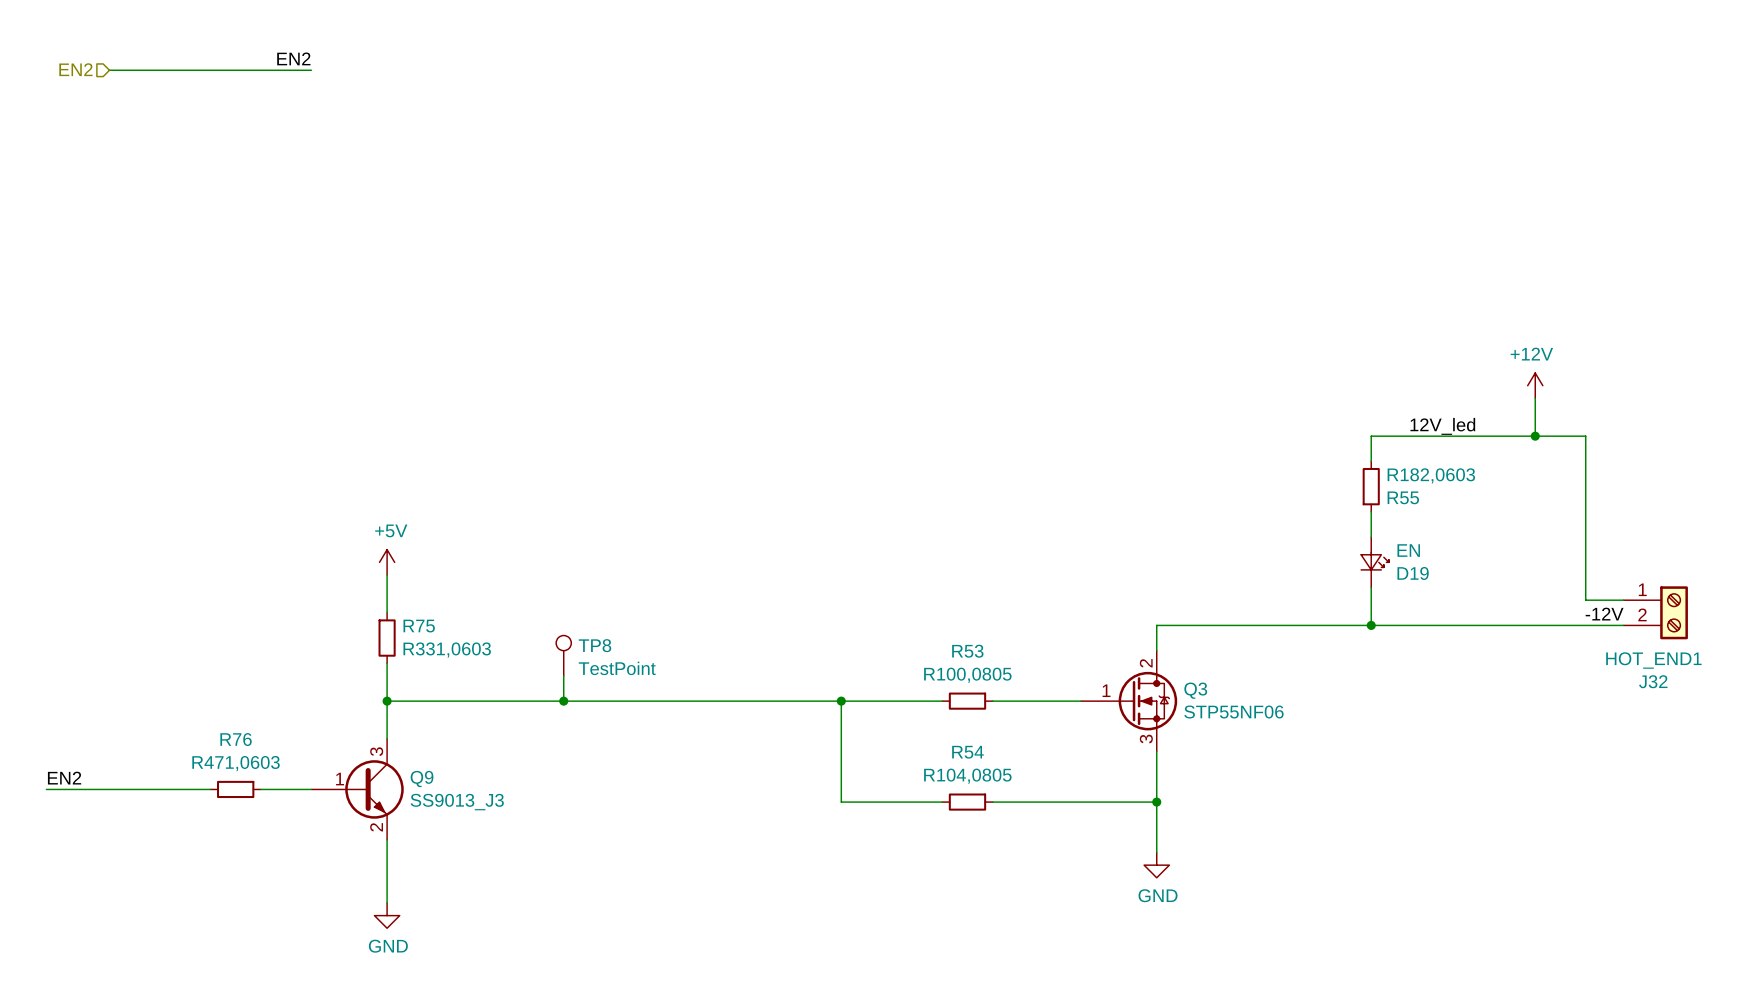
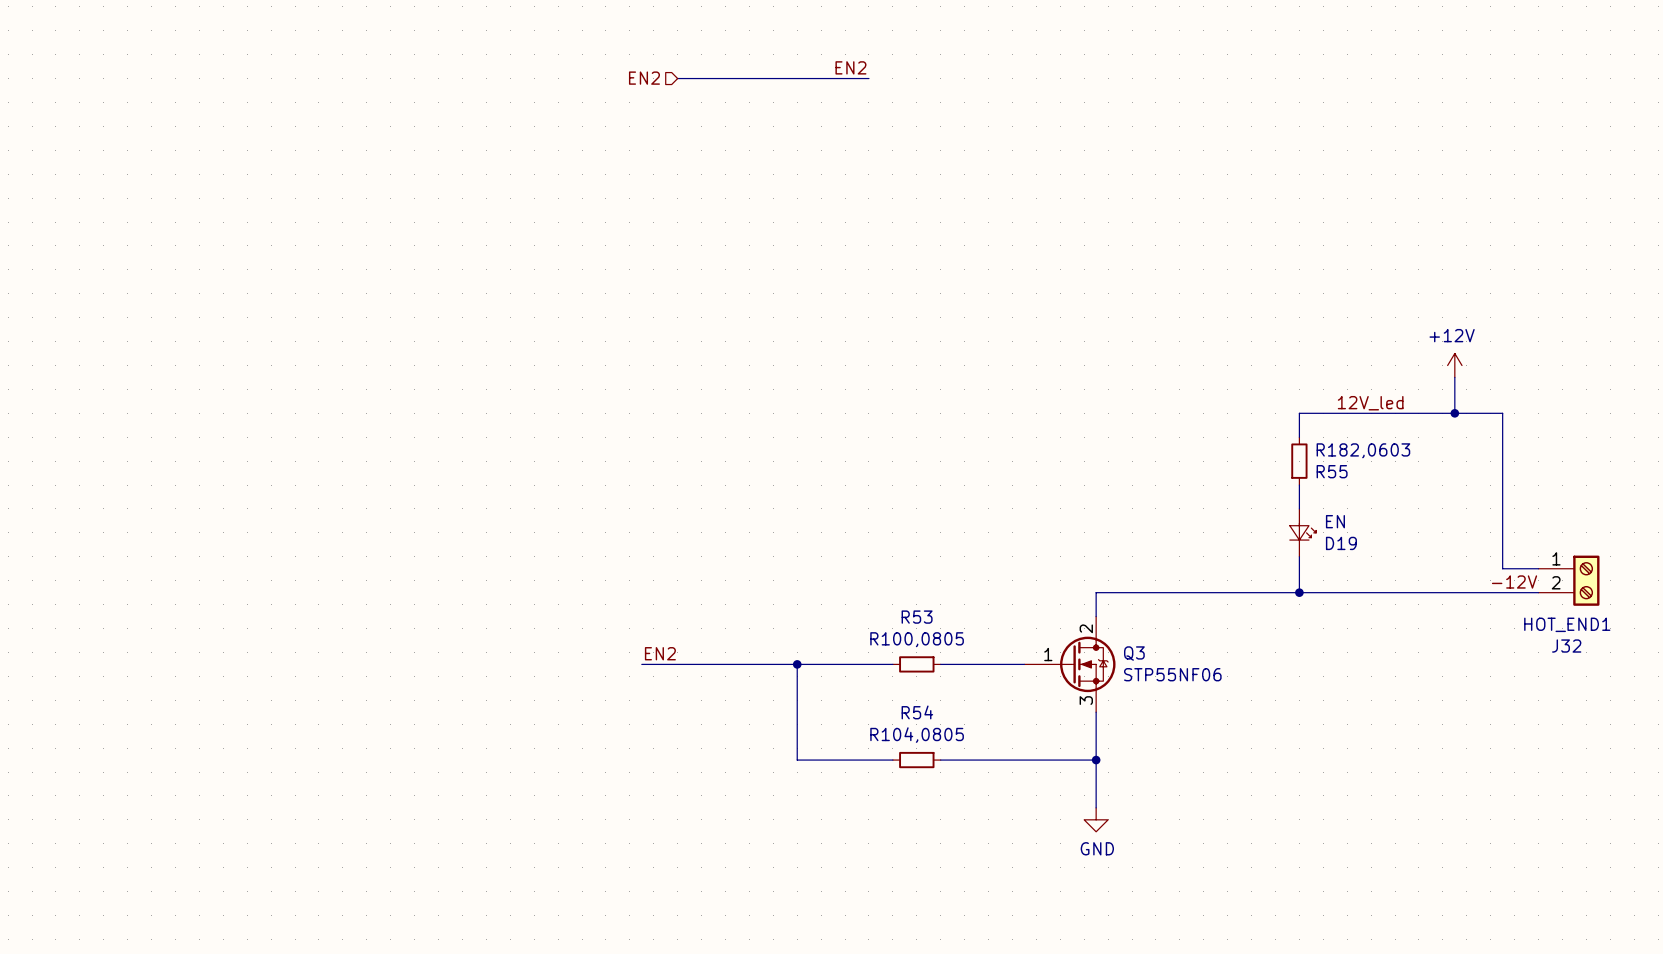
label: EN2 (293, 58) -> none
hierarchical label: EN2 (75, 69) -> none
wire: (109, 70) (311, 70) -> none
label: none -> EN2 (850, 67)
hierarchical label: none -> EN2 (644, 78)
wire: none -> (677, 78) (868, 78)
power symbol: +5V (387, 562) -> none
wire: (387, 574) (387, 612) -> none
R75: R331,0603 (387, 638) -> none
TP8: TestPoint (563, 655) -> none
wire: (387, 663) (387, 738) -> none
wire: (563, 675) (563, 701) -> none
label: none -> EN2 (660, 653)
wire: (387, 701) (677, 701) -> none
junction: (387, 701) -> none
junction: (563, 701) -> none
label: EN2 (64, 778) -> none
wire: (46, 789) (210, 789) -> none
R76: R471,0603 (235, 789) -> none
wire: (260, 789) (311, 789) -> none
Q9: SS9013_J3 (357, 789) -> none
wire: (387, 839) (387, 903) -> none
power symbol: GND (387, 915) -> none

